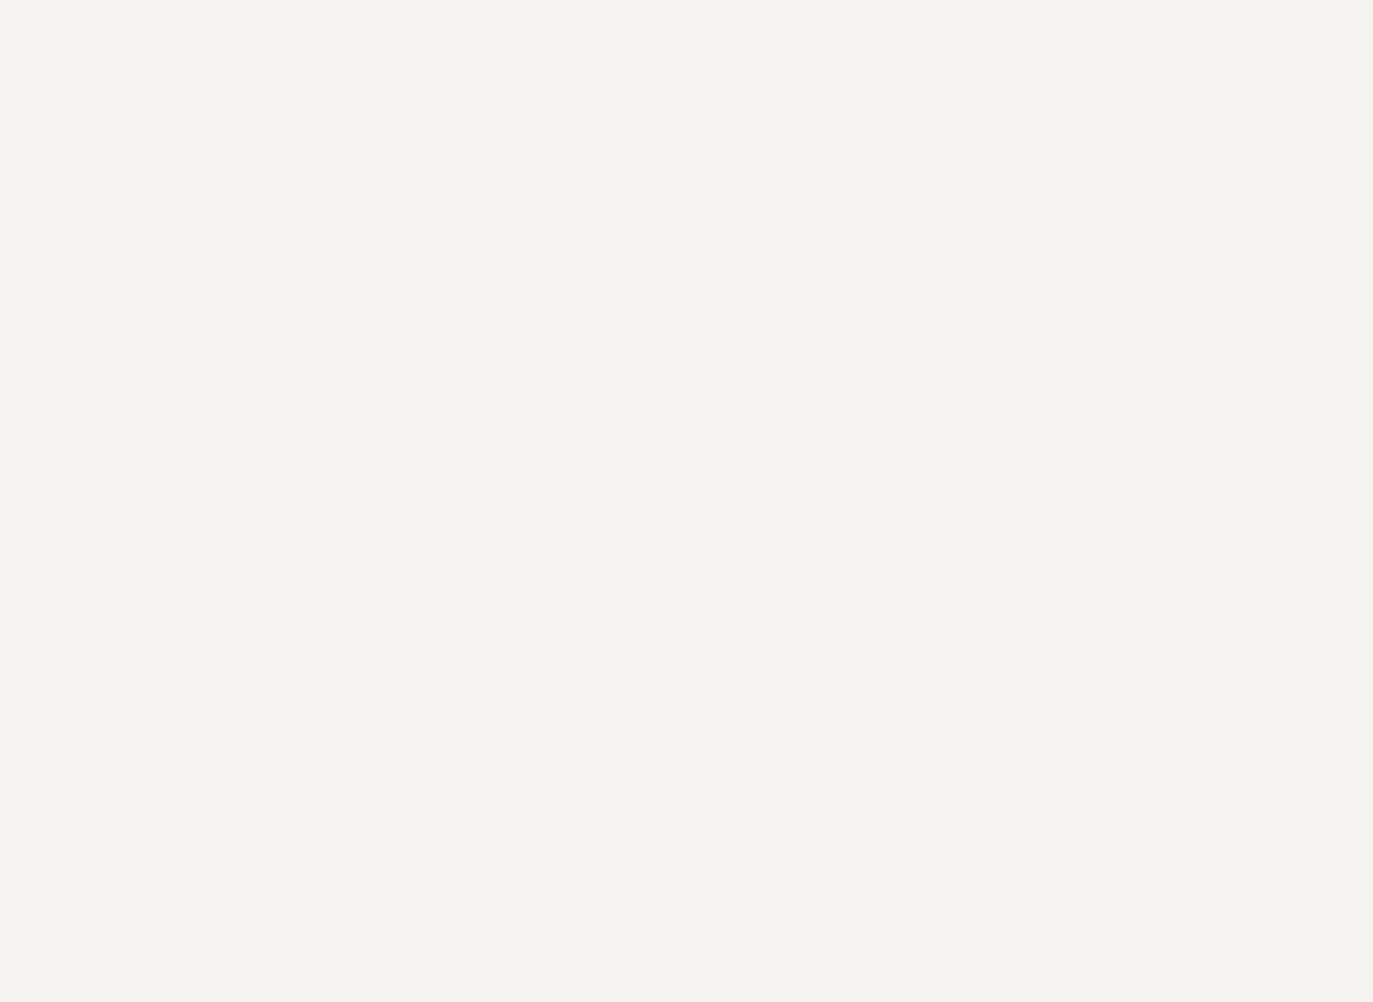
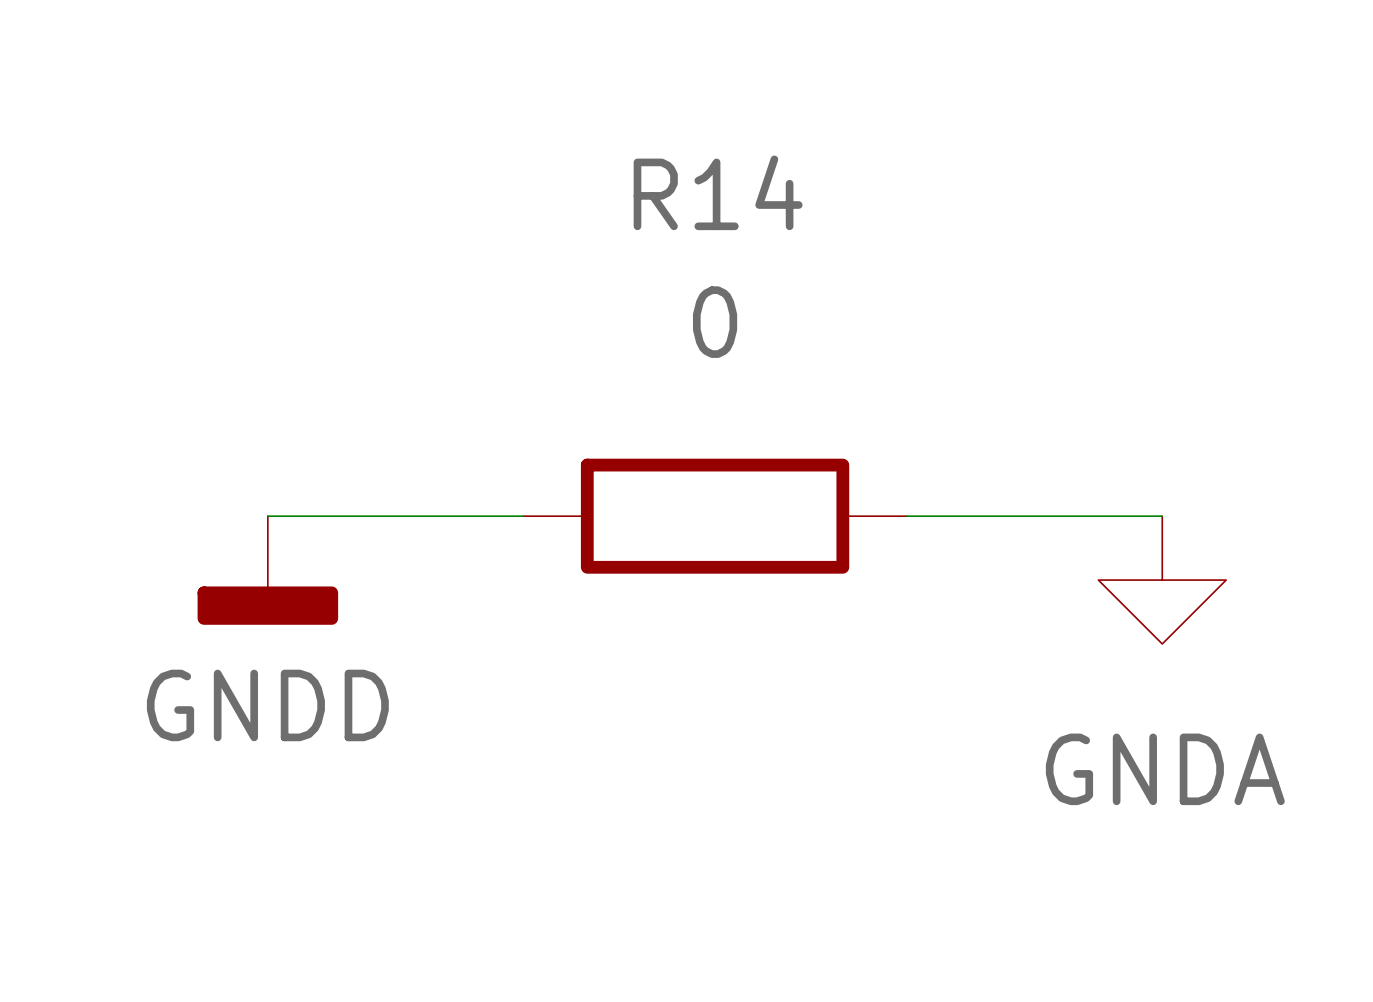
wire: none -> (267, 516) (523, 516)
R14: none -> 0 (715, 516)
wire: none -> (906, 516) (1162, 516)
power symbol: none -> GNDD (267, 570)
power symbol: none -> GNDA (1162, 580)

